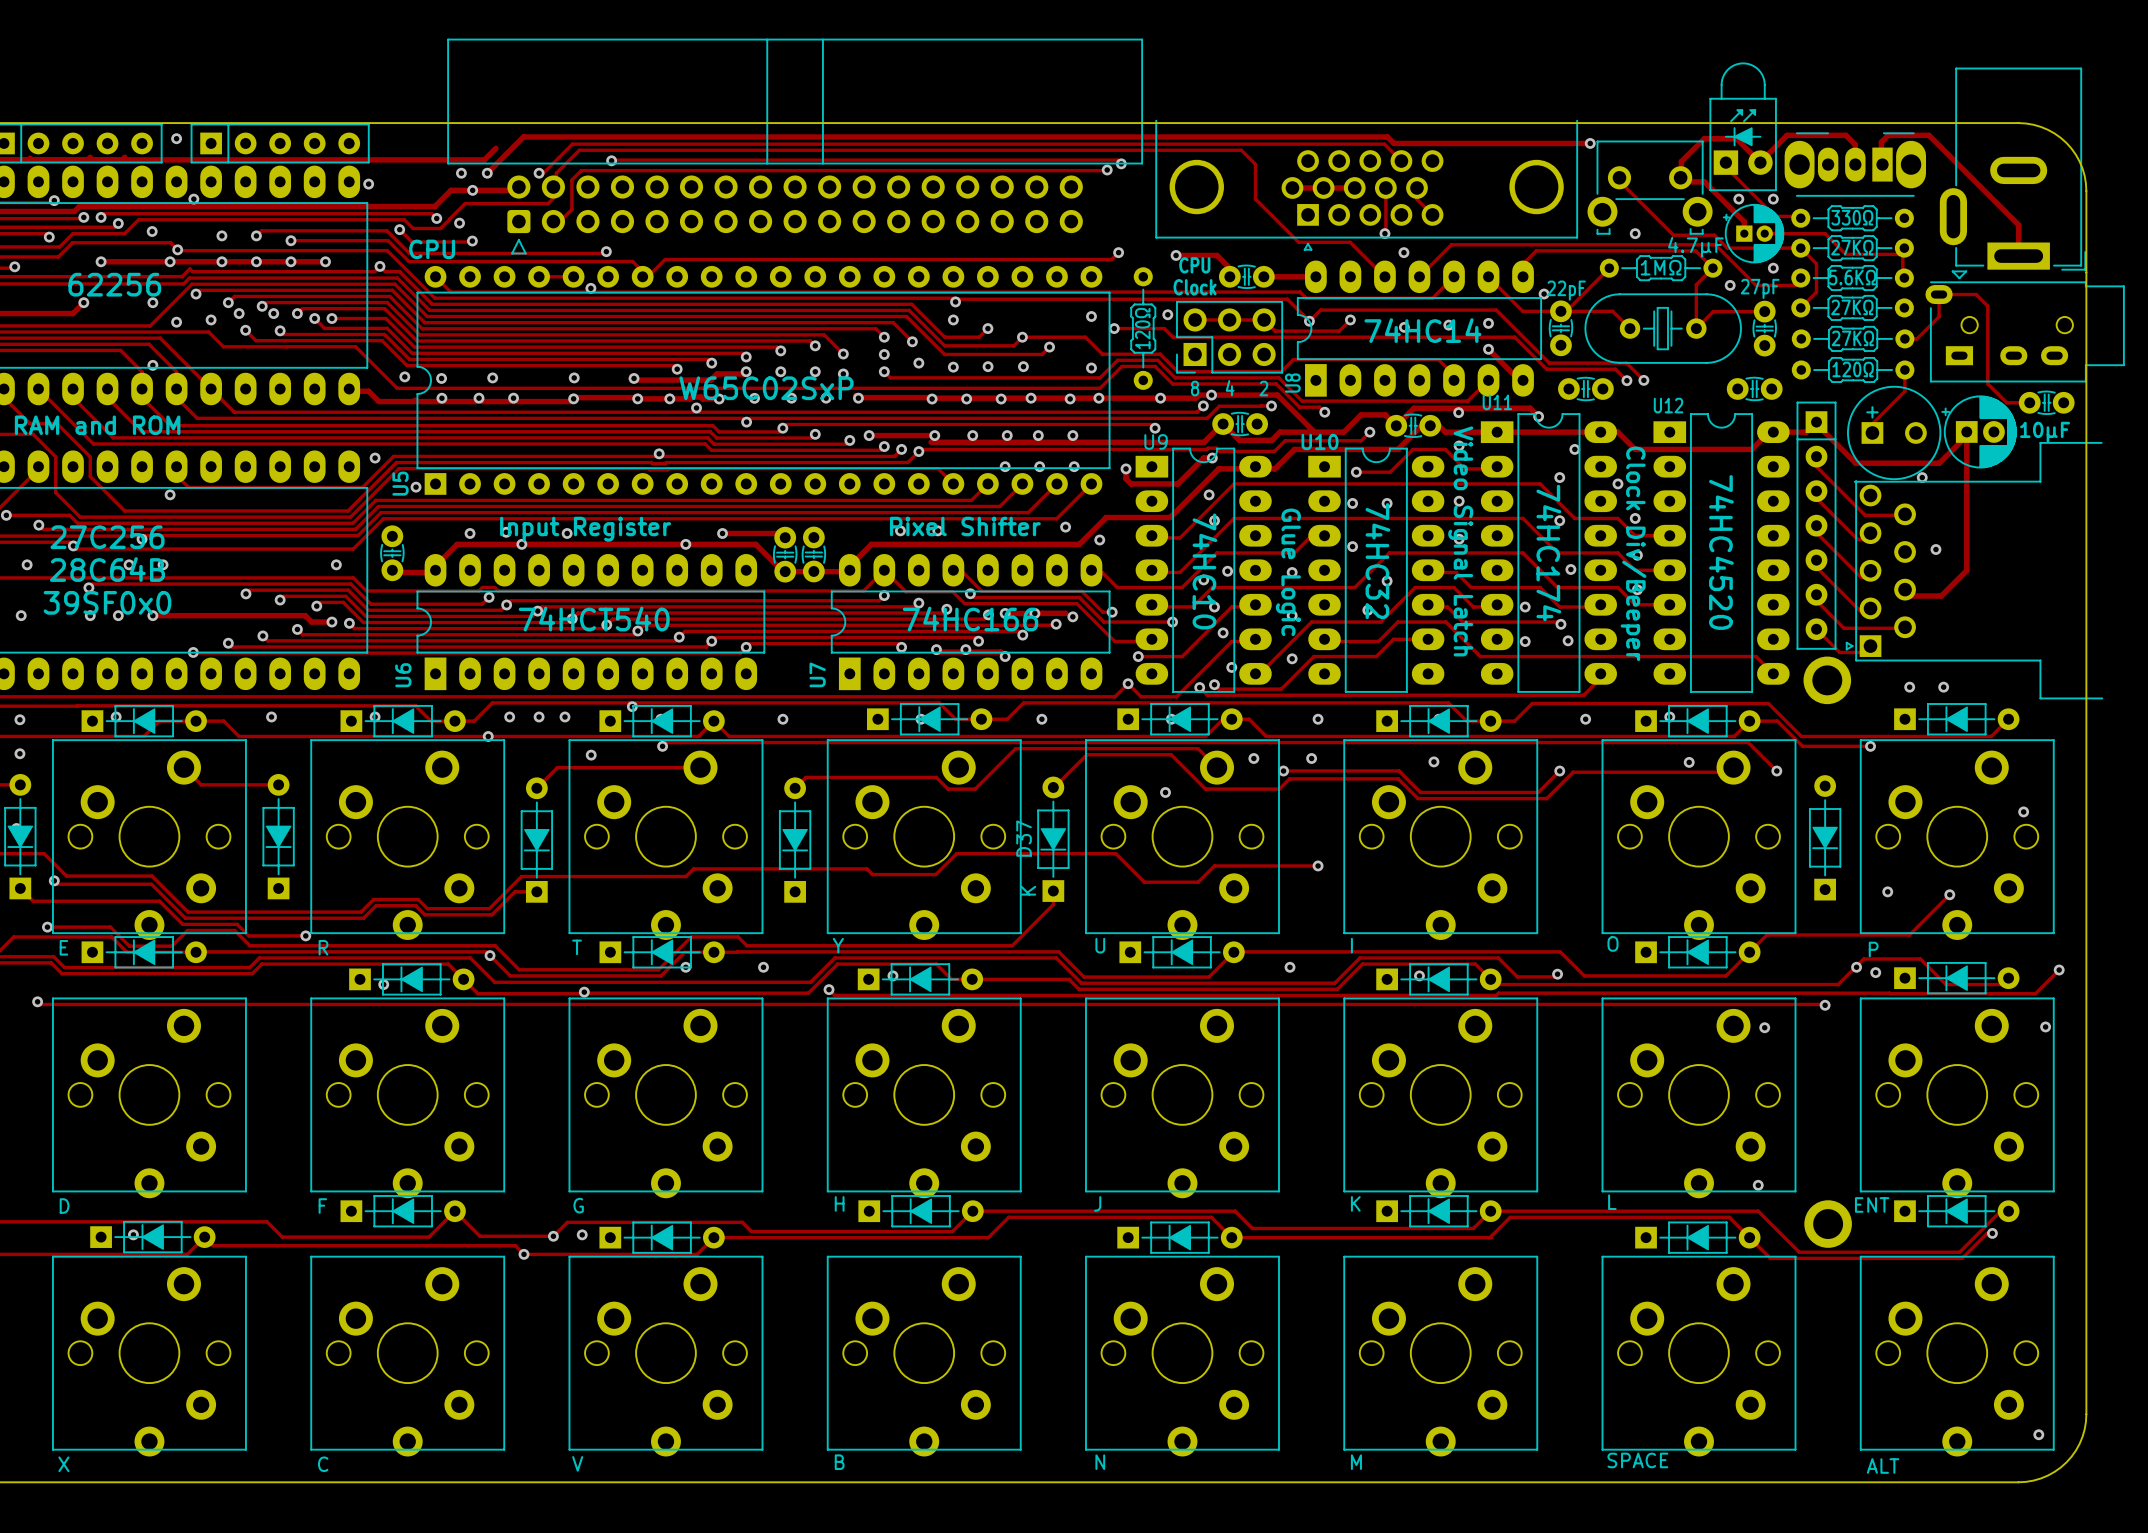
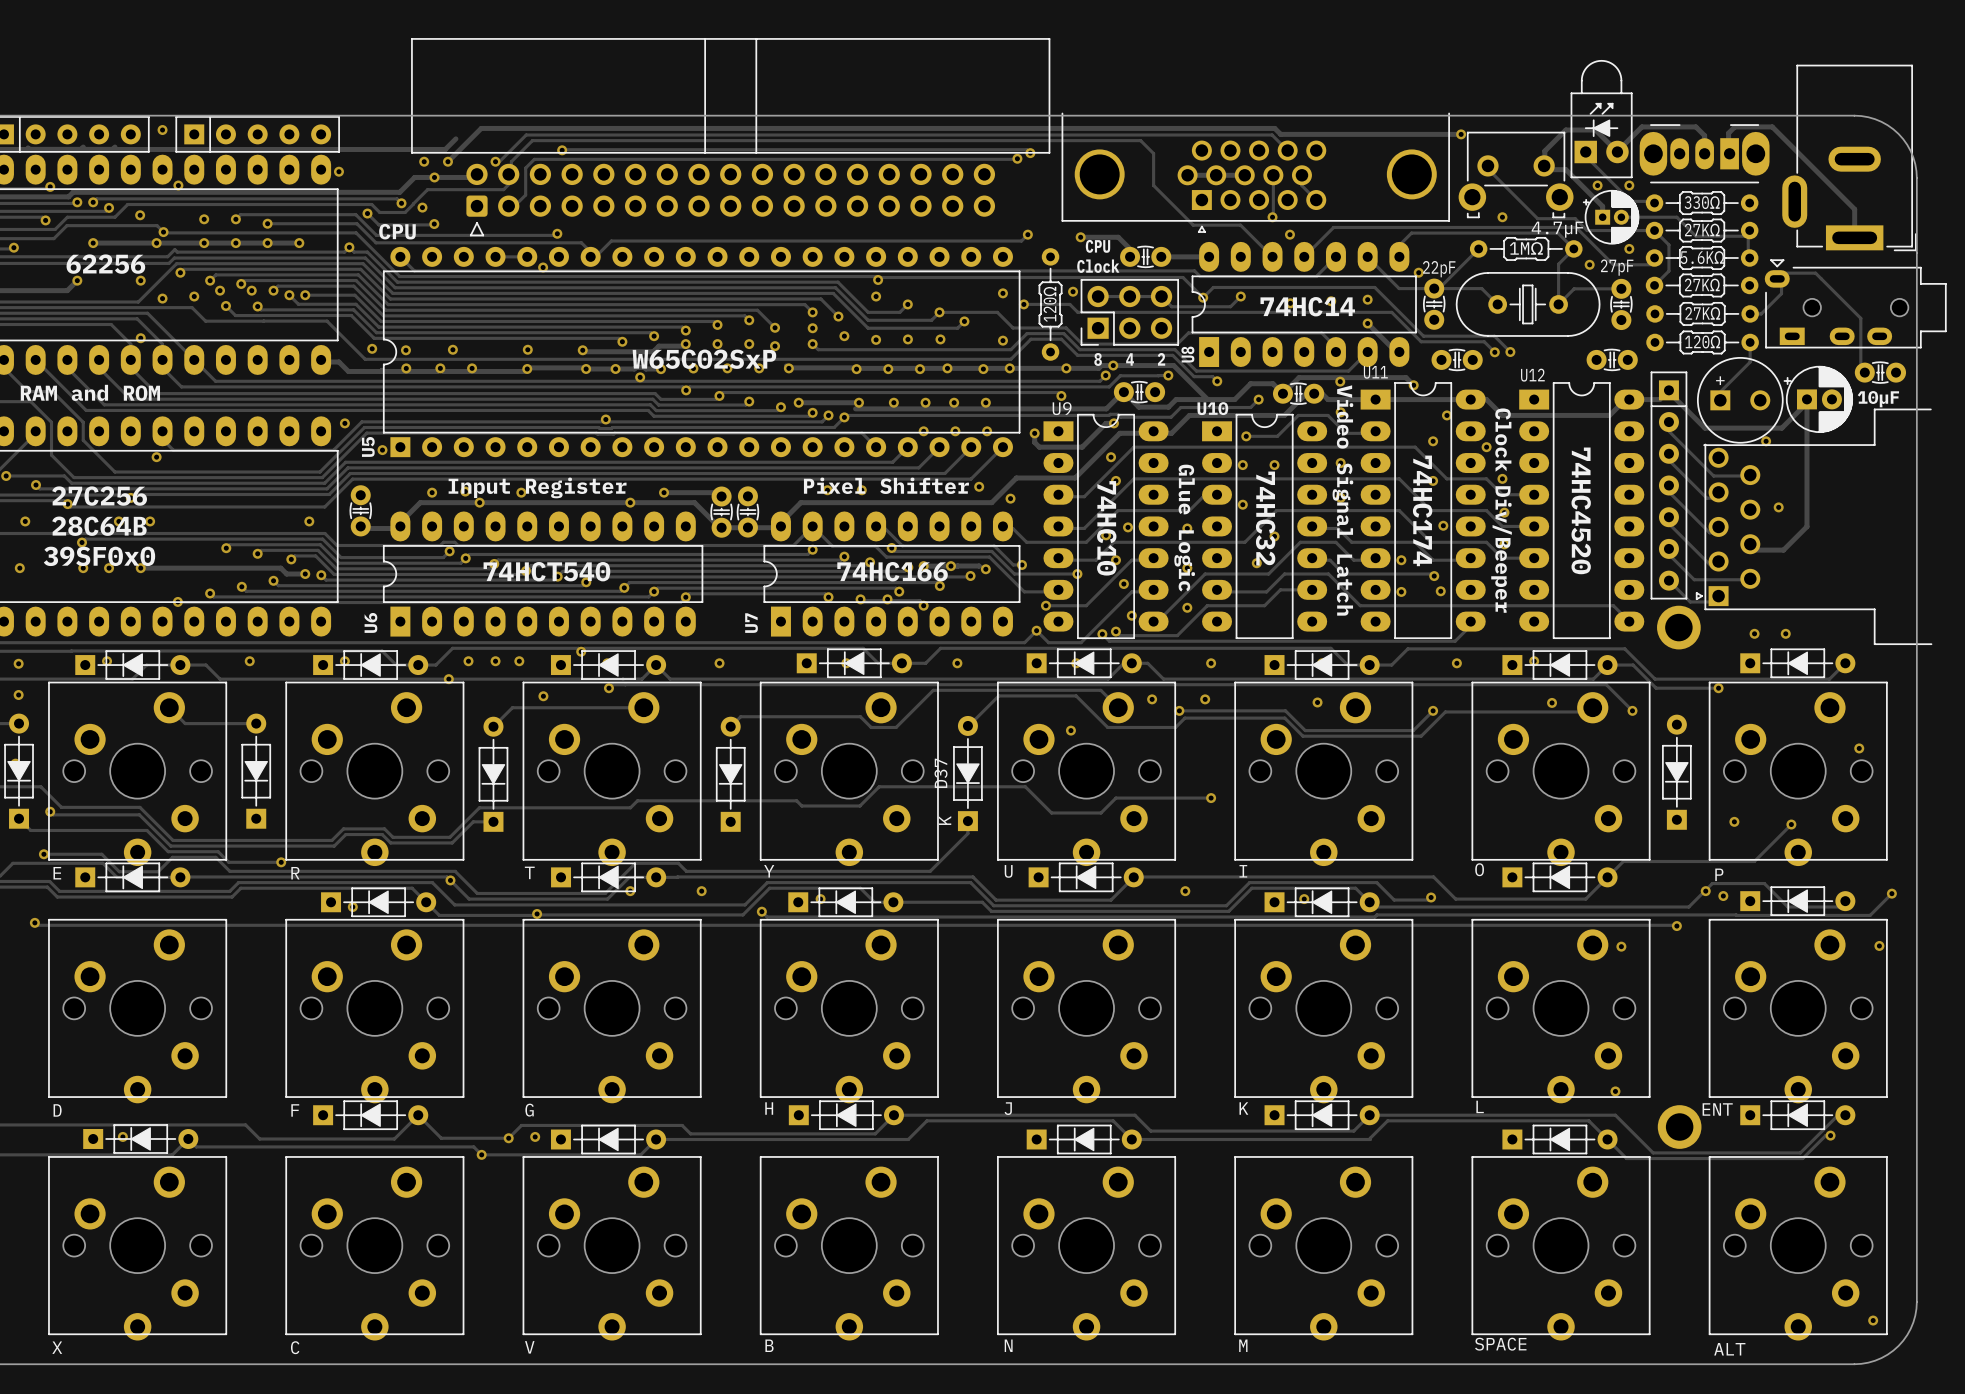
part footprint: [1925, 270, 2125, 383] -> [1764, 259, 1947, 349]
track: (1987, 306) (1987, 383) (2006, 402) (2029, 402) -> (1826, 283) (1860, 318) (1860, 368) (1864, 372)

